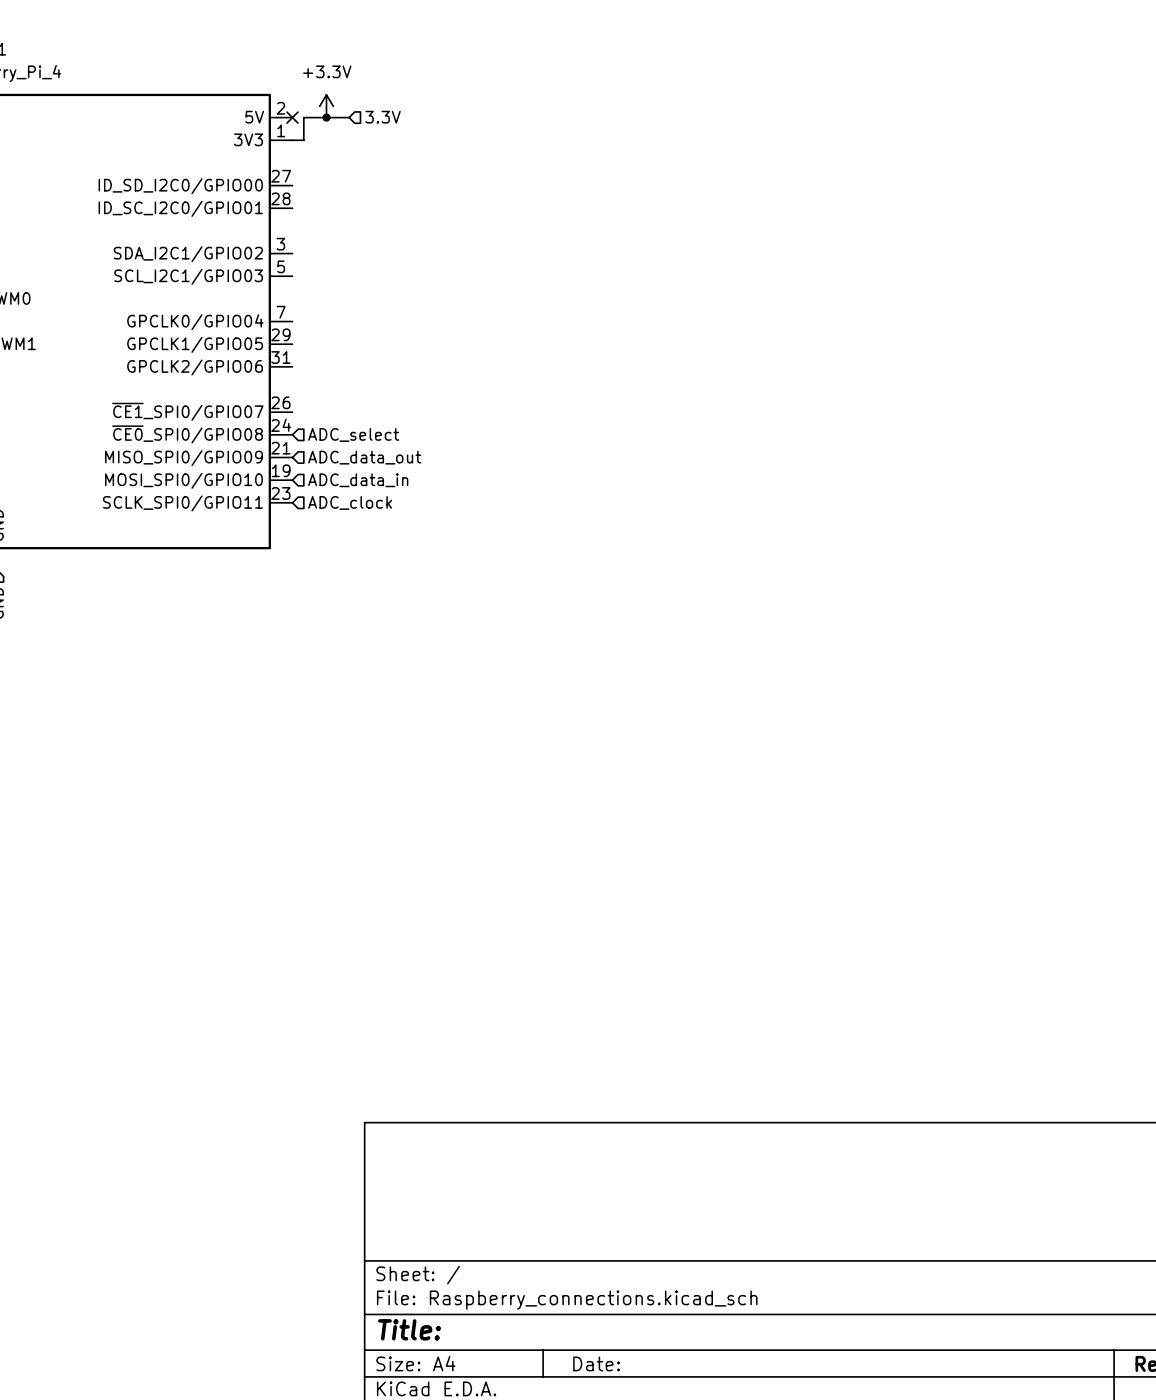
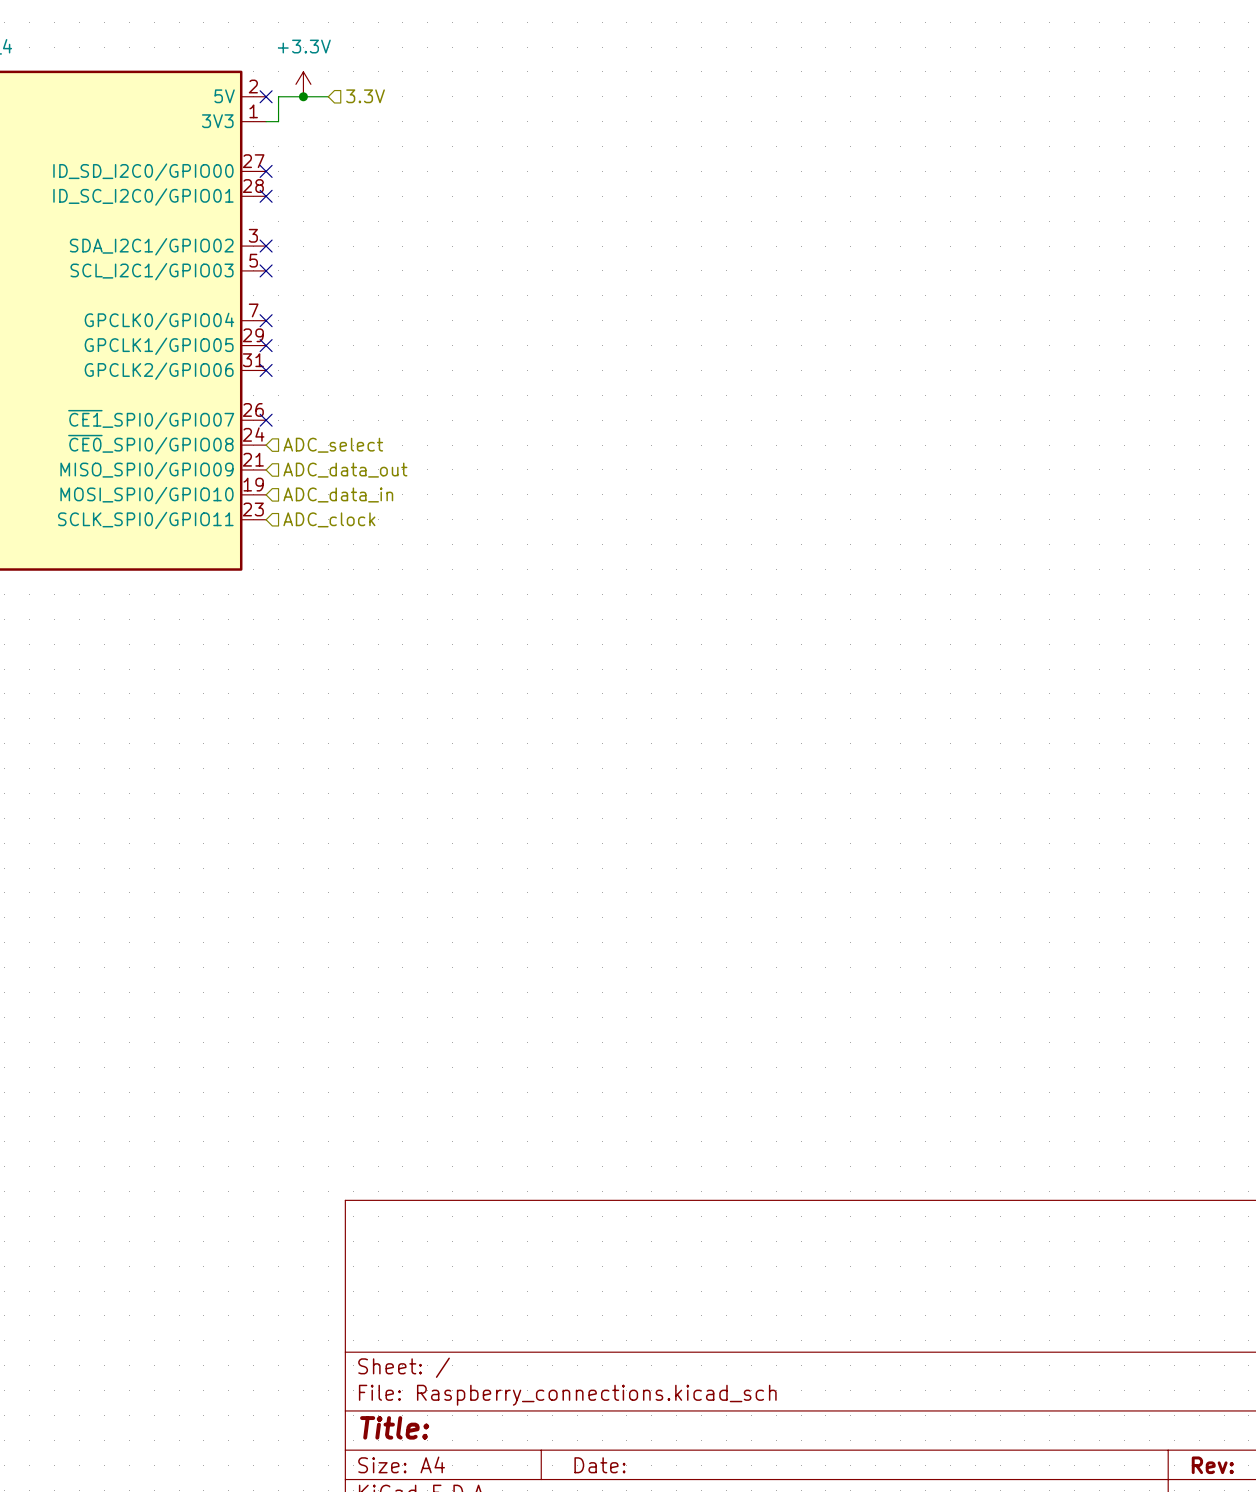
no-connect mark: none -> (266, 171)
no-connect mark: none -> (266, 196)
no-connect mark: none -> (266, 246)
no-connect mark: none -> (266, 270)
no-connect mark: none -> (266, 320)
no-connect mark: none -> (266, 345)
no-connect mark: none -> (266, 370)
no-connect mark: none -> (266, 420)

